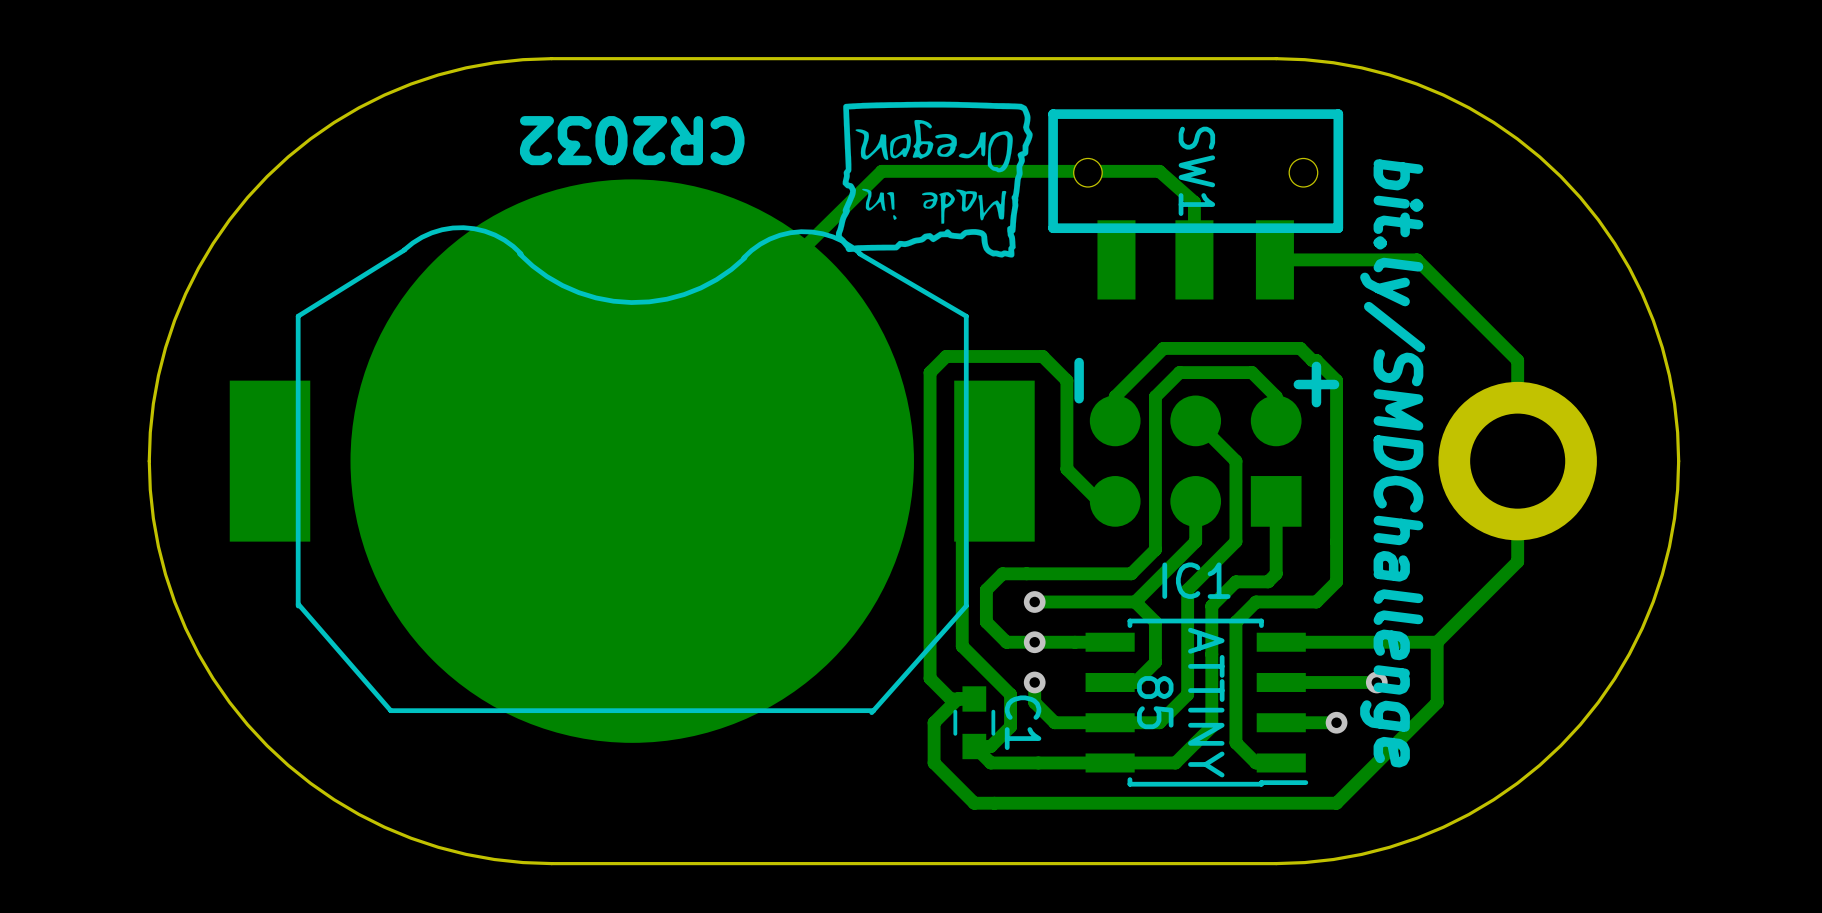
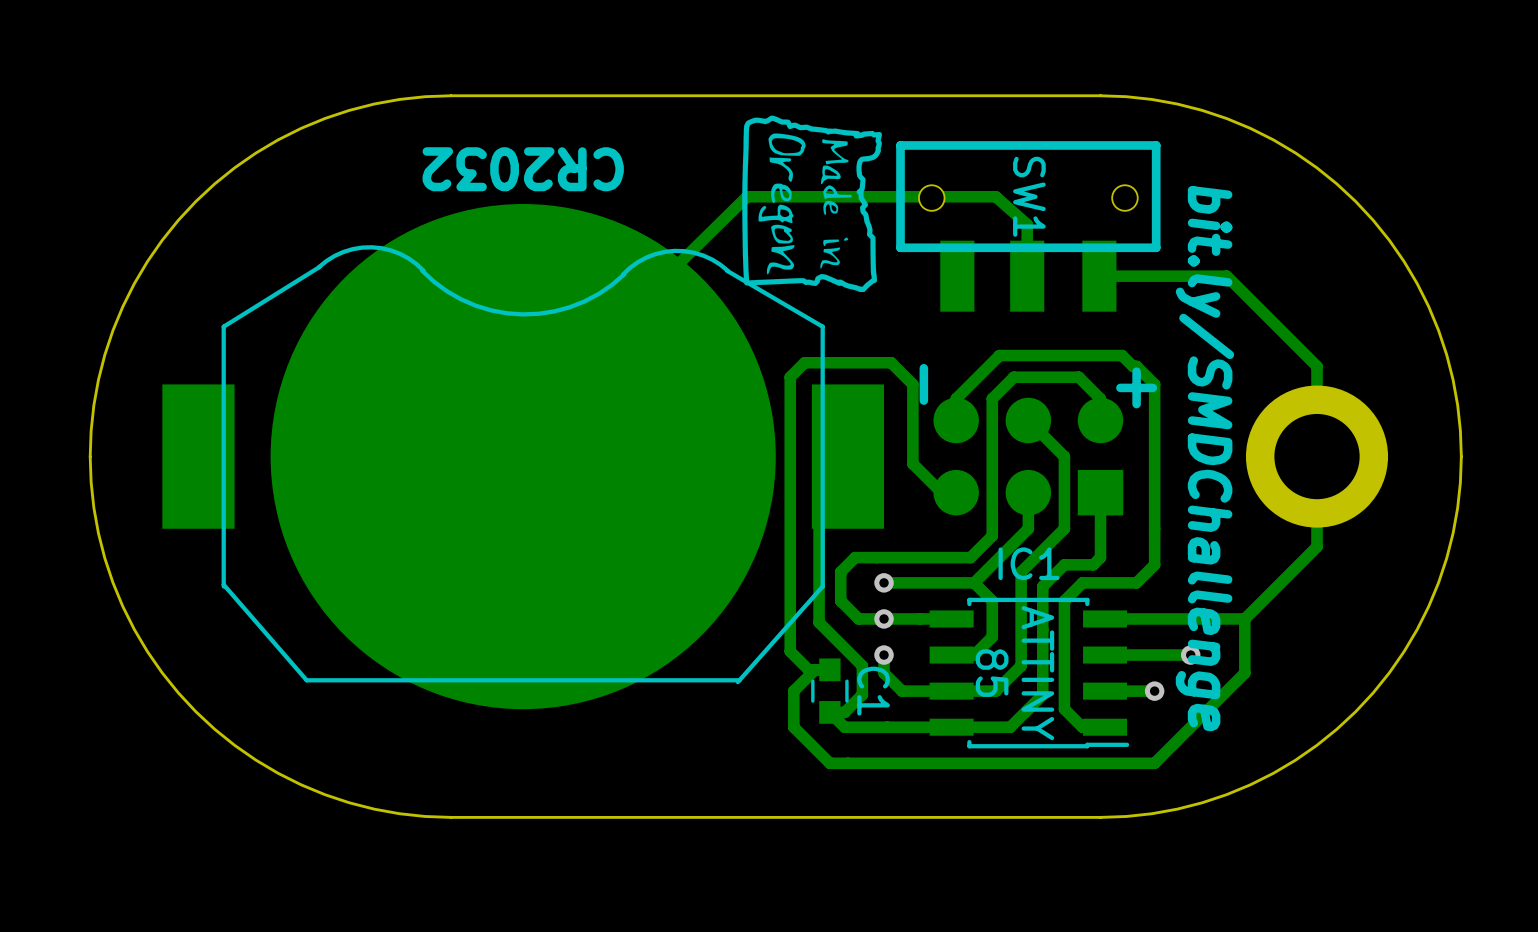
drawing shape: [835, 101, 1033, 258] -> [742, 115, 882, 293]

